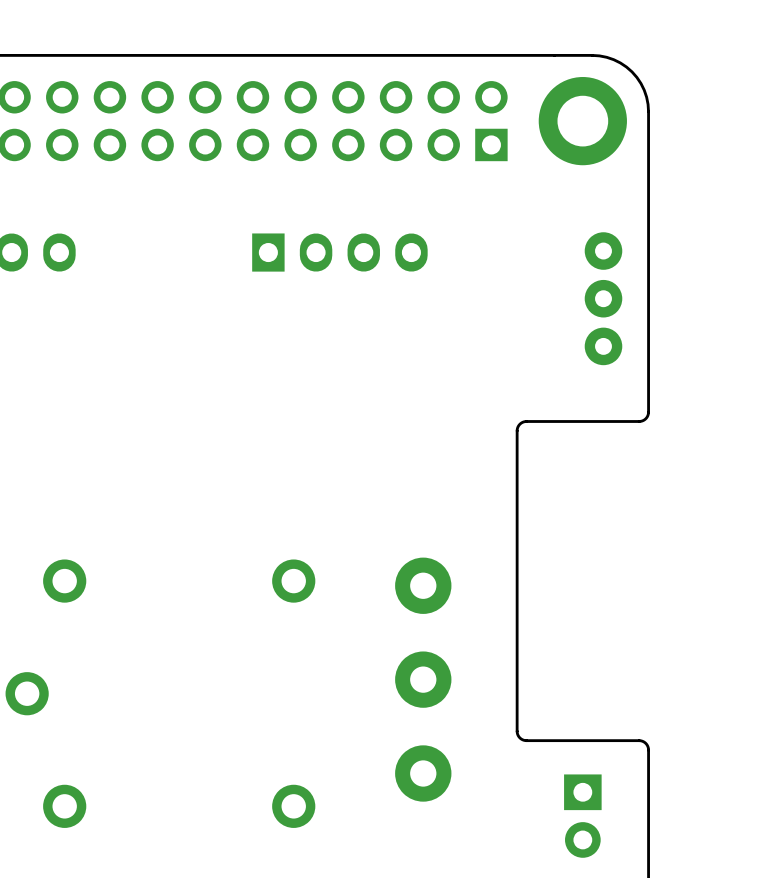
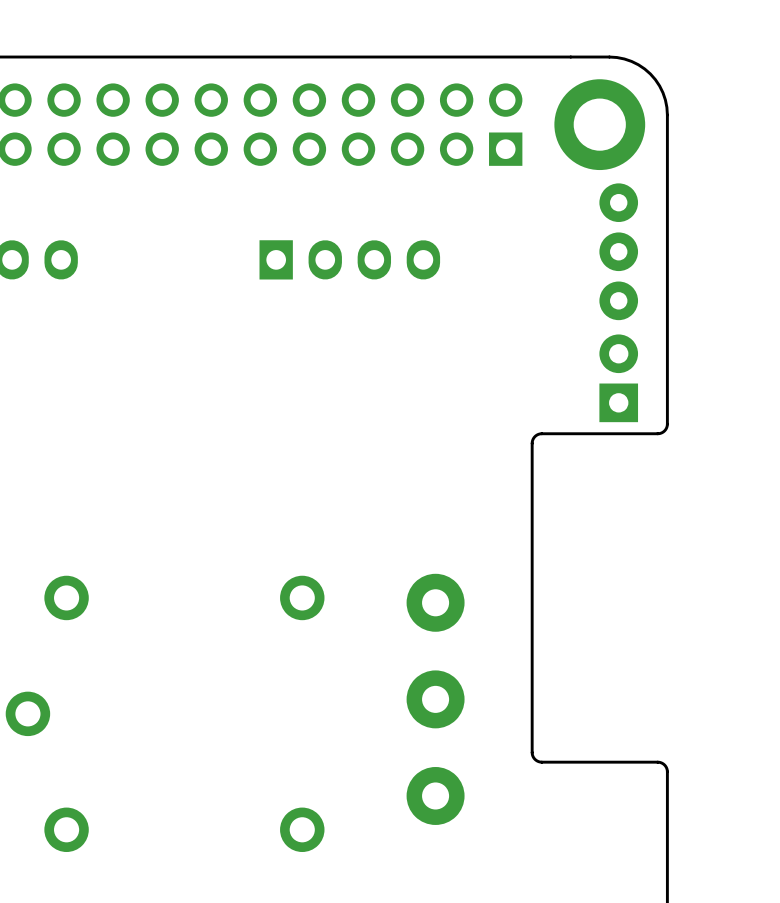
part position: (603, 298) -> (618, 251)
part: none -> (618, 378)
part: (582, 816) -> none

